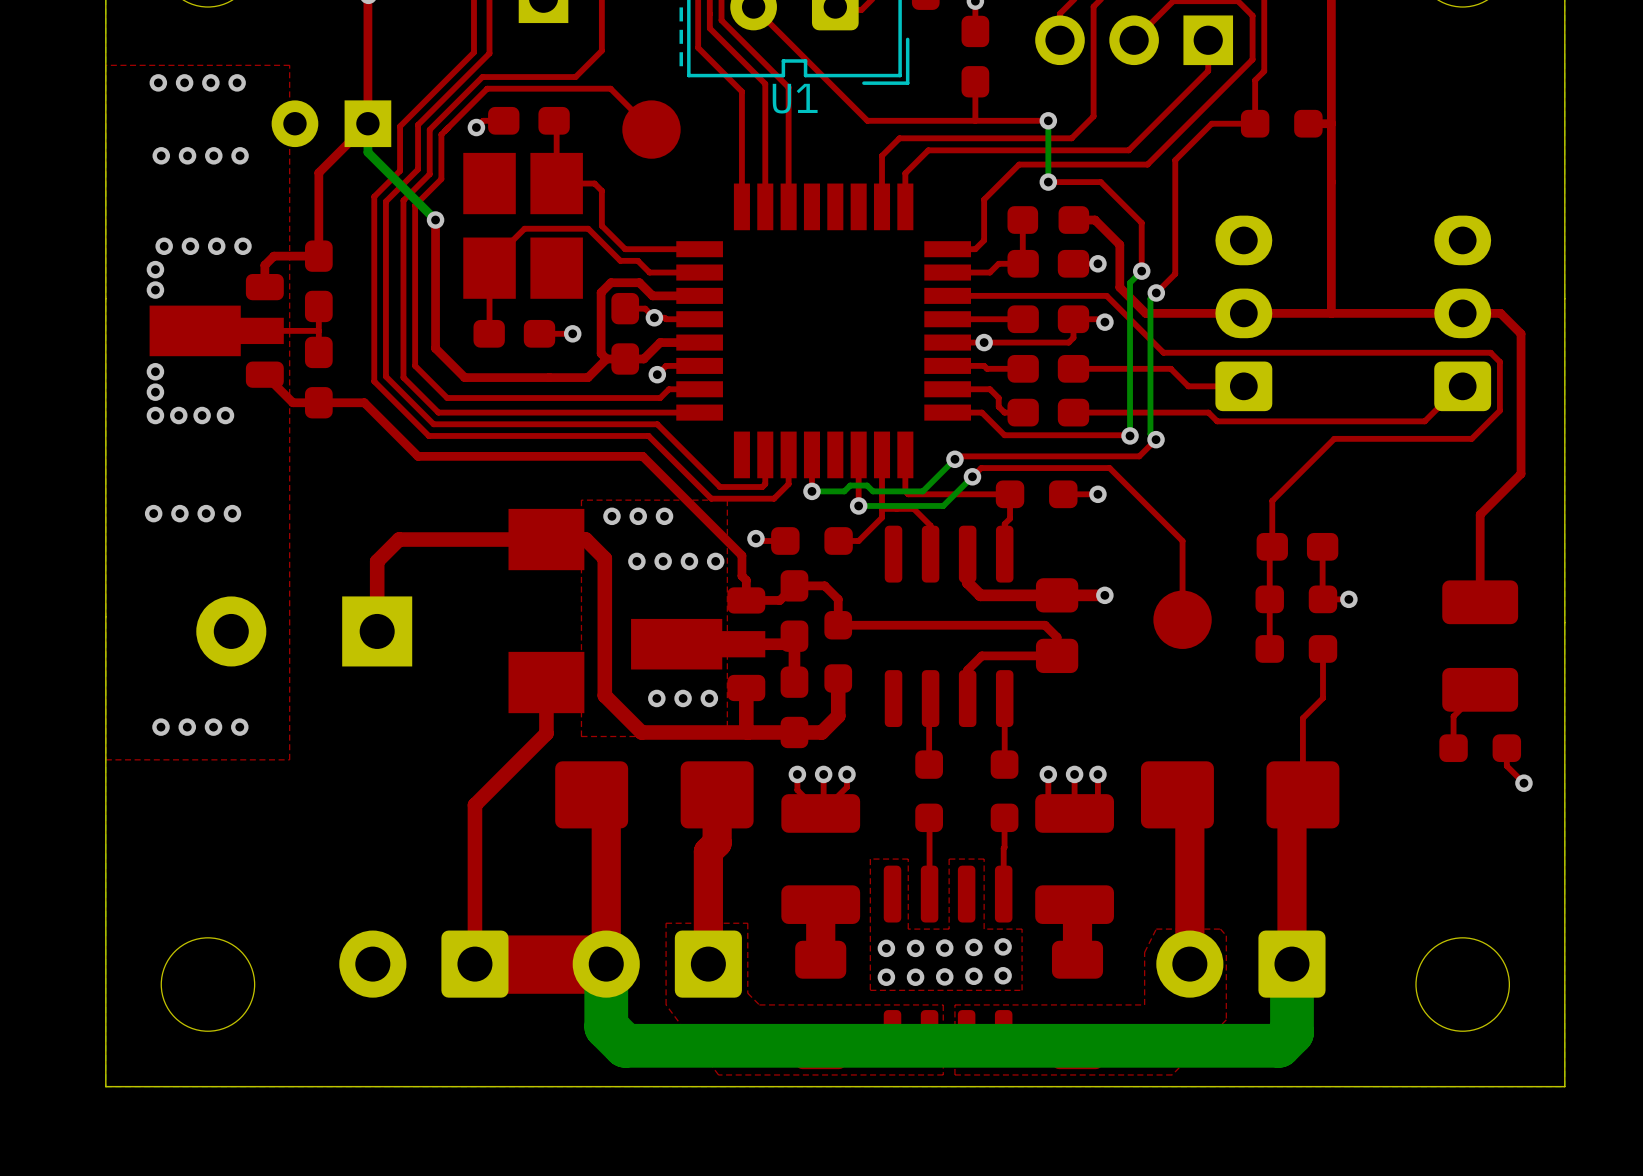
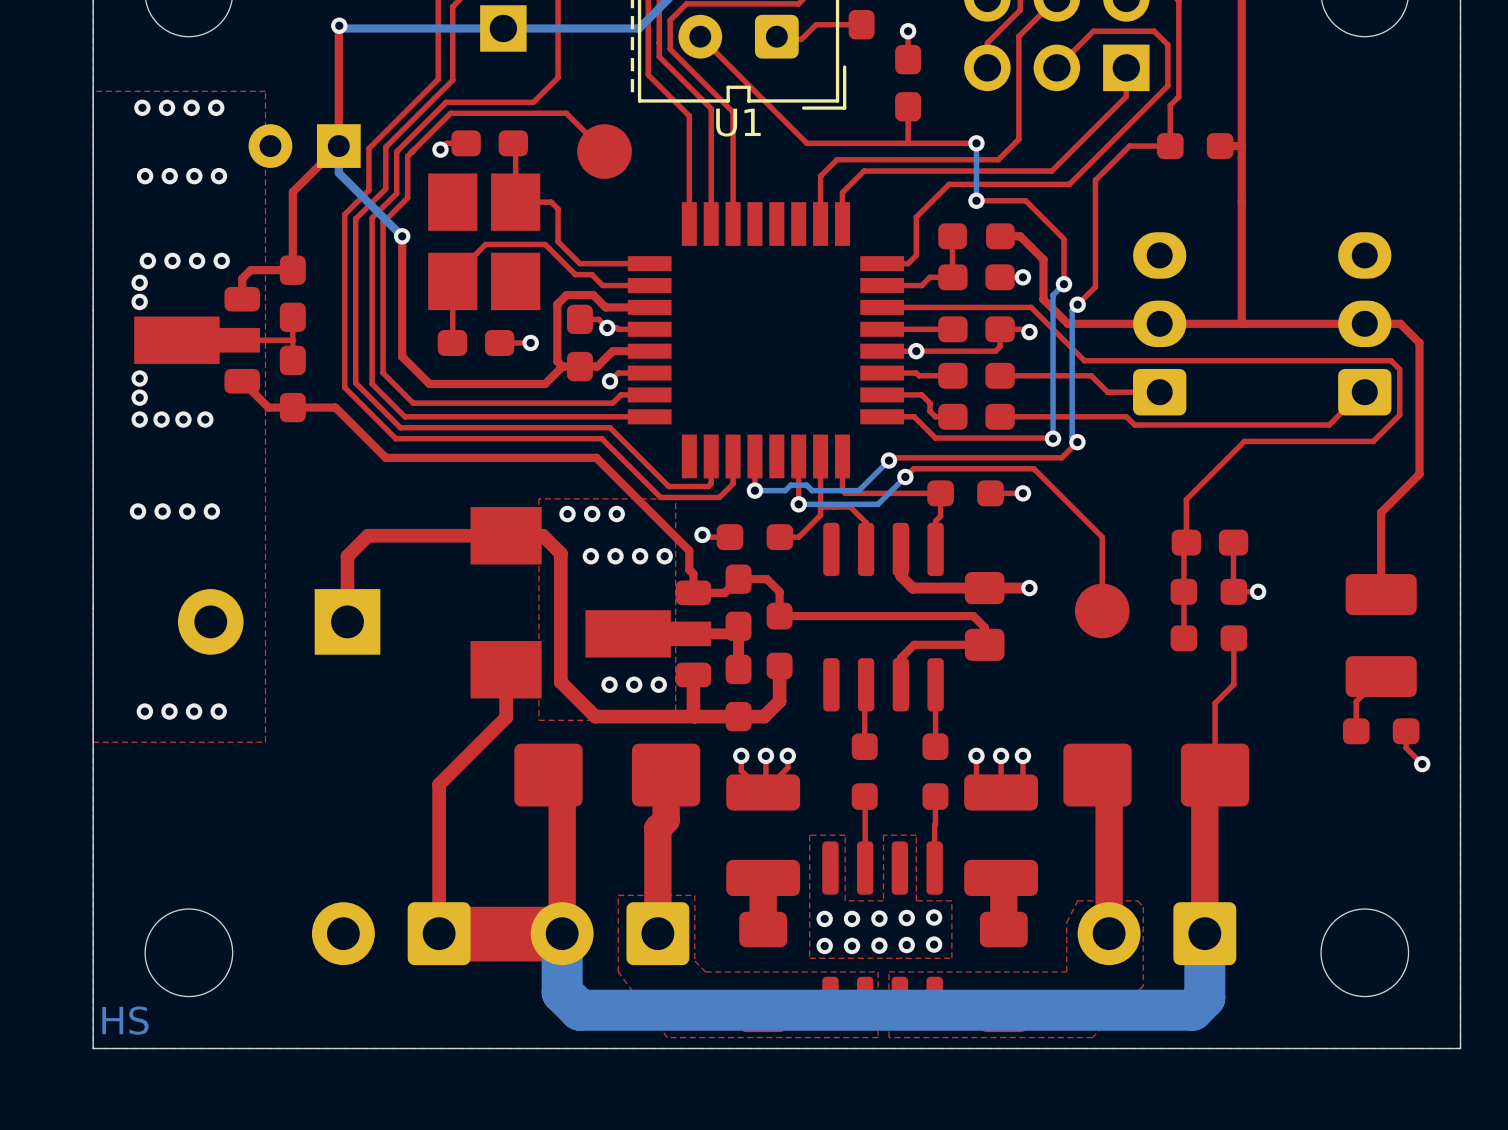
text: none -> HS (125, 1020)

